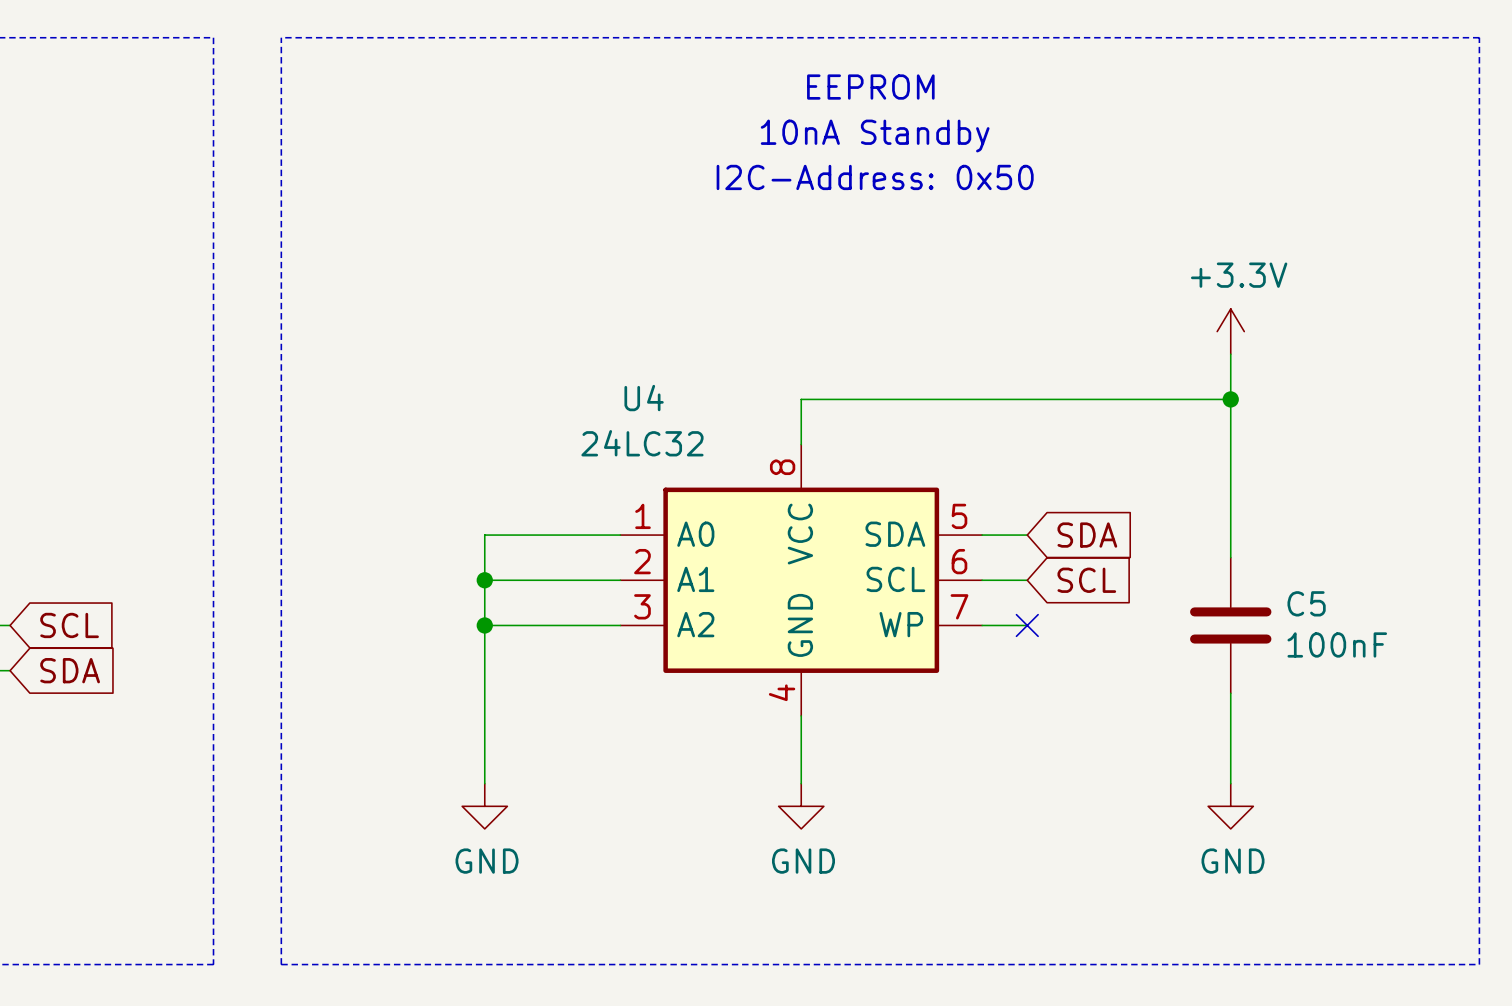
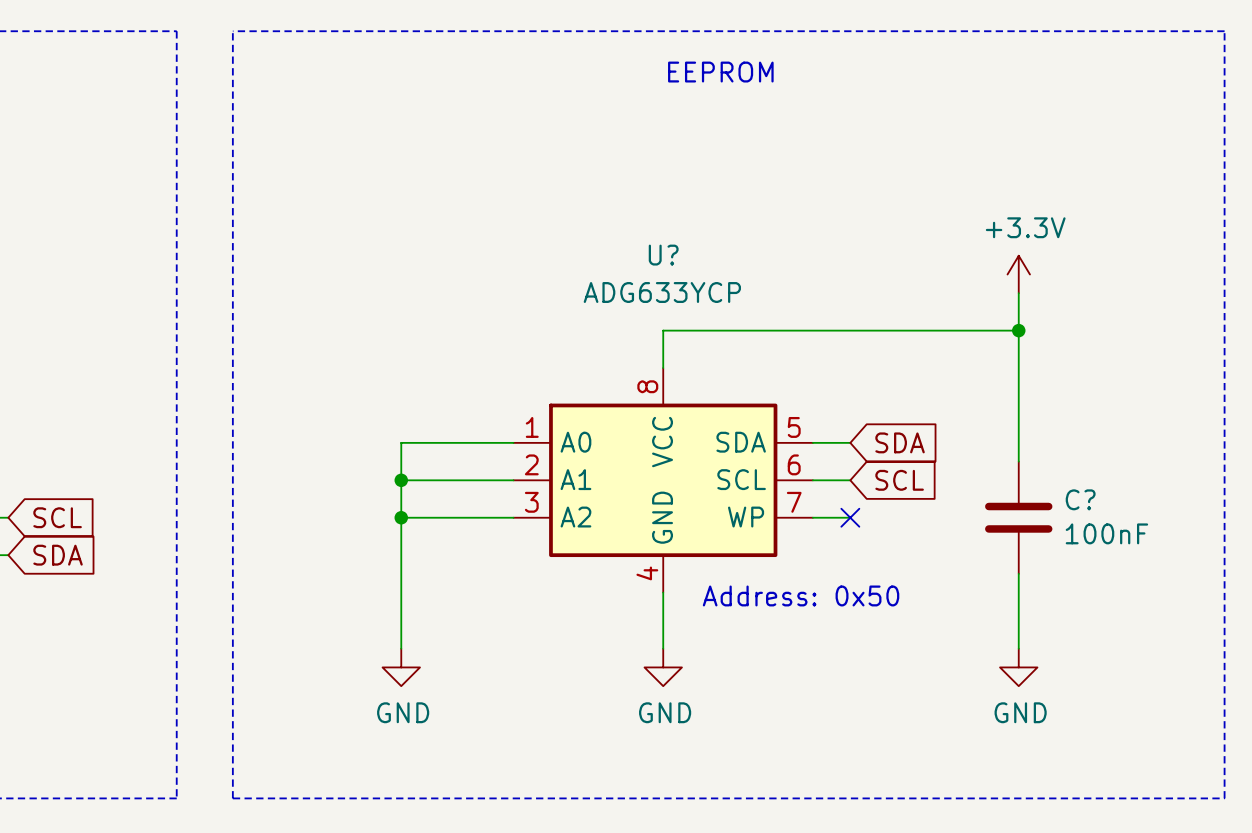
text: 10nA Standby (875, 136) -> none
text: I2C-Address: 0x50 (875, 177) -> none
U4 name: U4 (644, 398) -> U? (663, 255)
U4 value: 24LC32 (642, 443) -> ADG633YCP (662, 292)
C5 name: C5 (1306, 603) -> C? (1080, 499)
text: none -> Address: 0x50 (801, 595)

